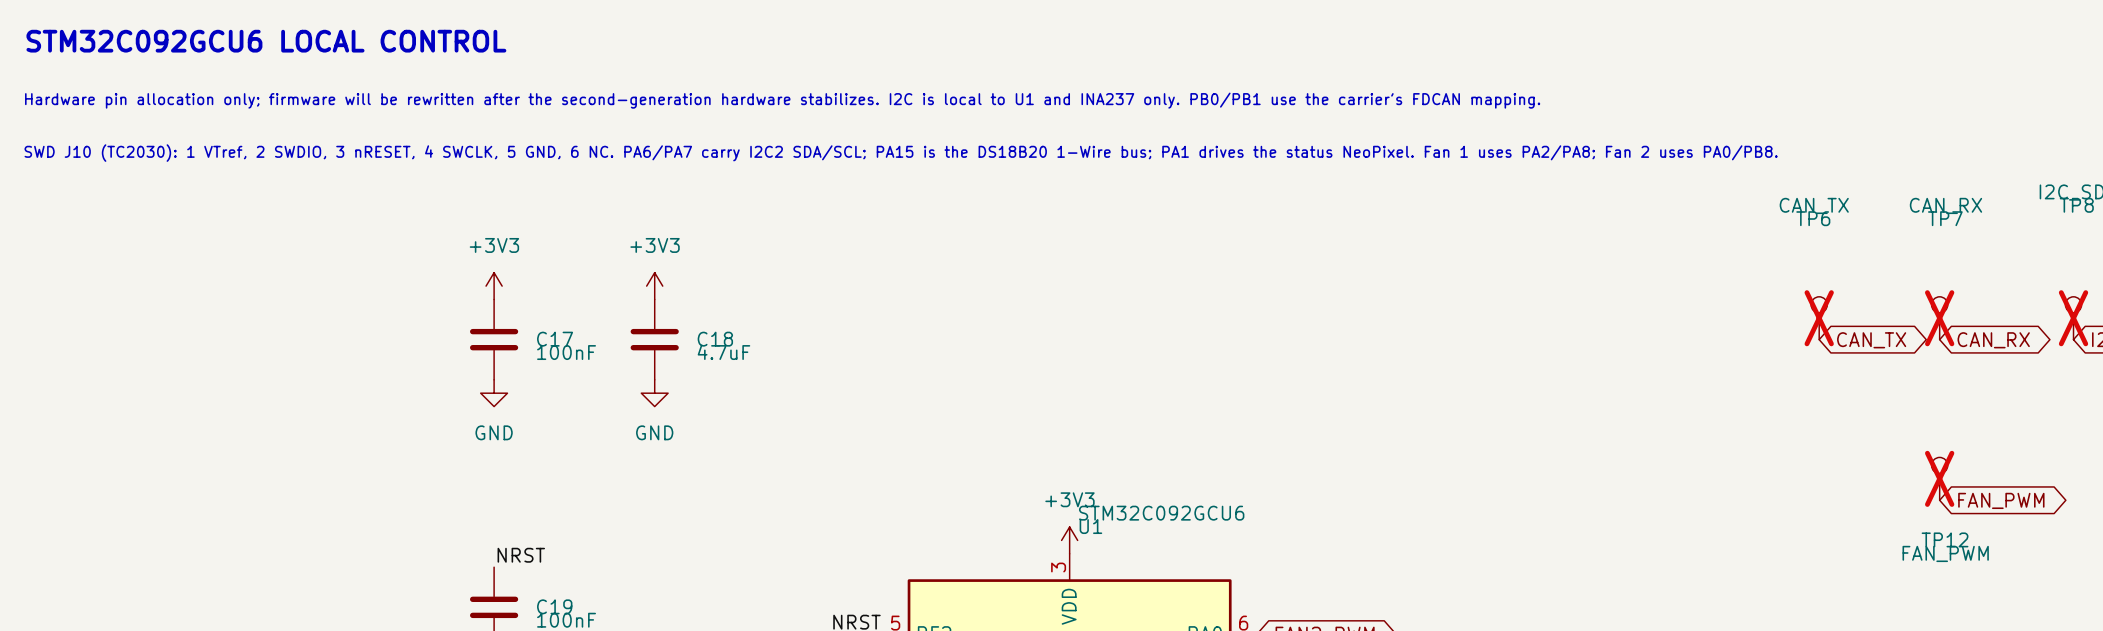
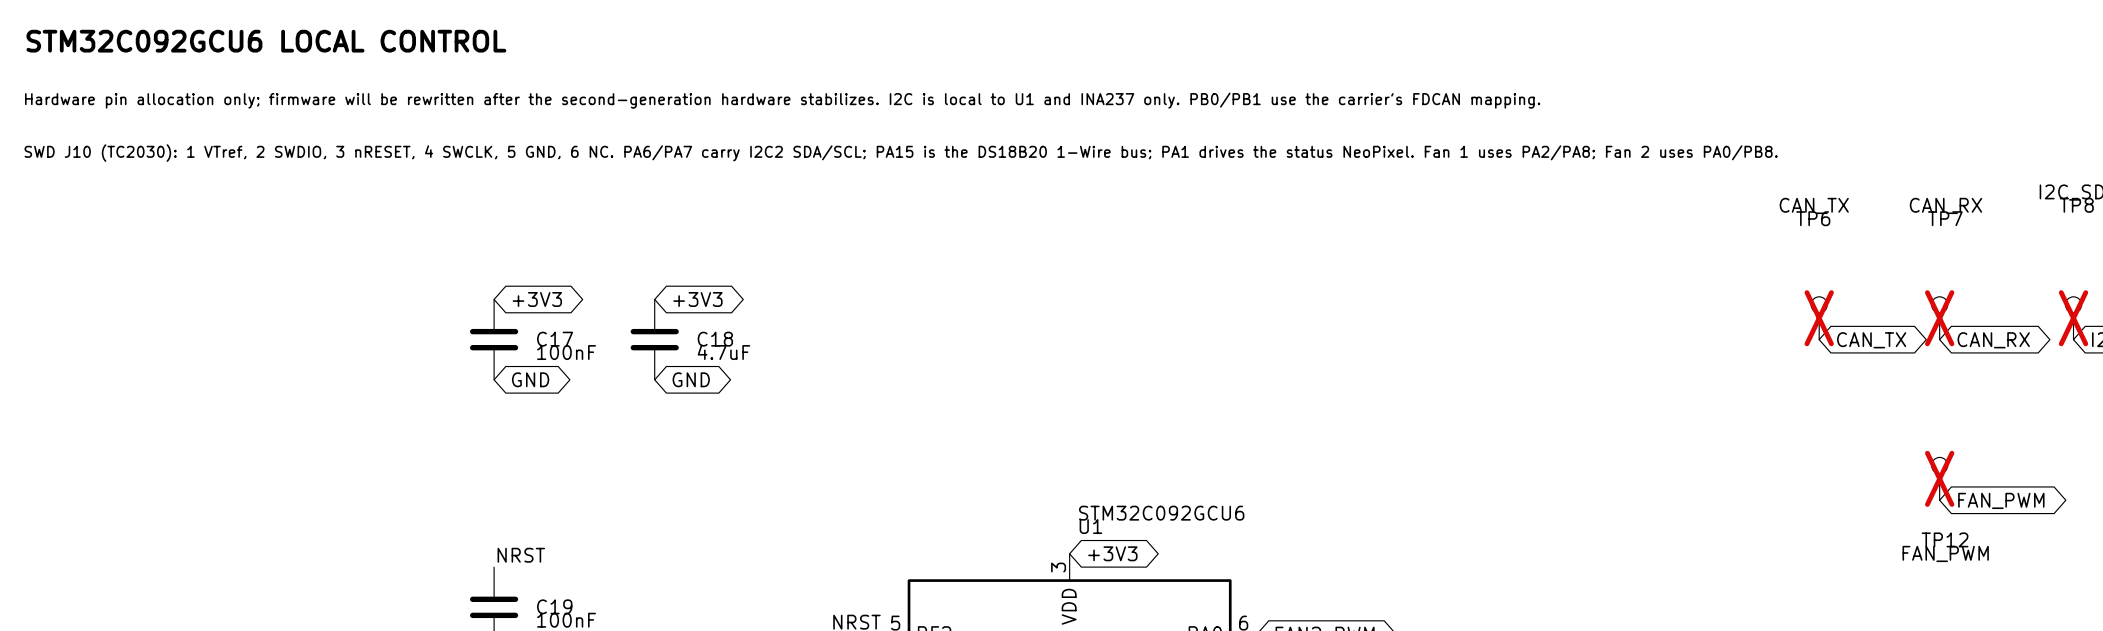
power symbol: +3V3 (494, 286) -> none
power symbol: +3V3 (654, 286) -> none
global label: none -> +3V3 (537, 299)
global label: none -> +3V3 (697, 299)
global label: none -> GND (530, 379)
global label: none -> GND (691, 379)
power symbol: GND (494, 393) -> none
power symbol: GND (654, 393) -> none
power symbol: +3V3 (1069, 540) -> none
global label: none -> +3V3 (1112, 553)

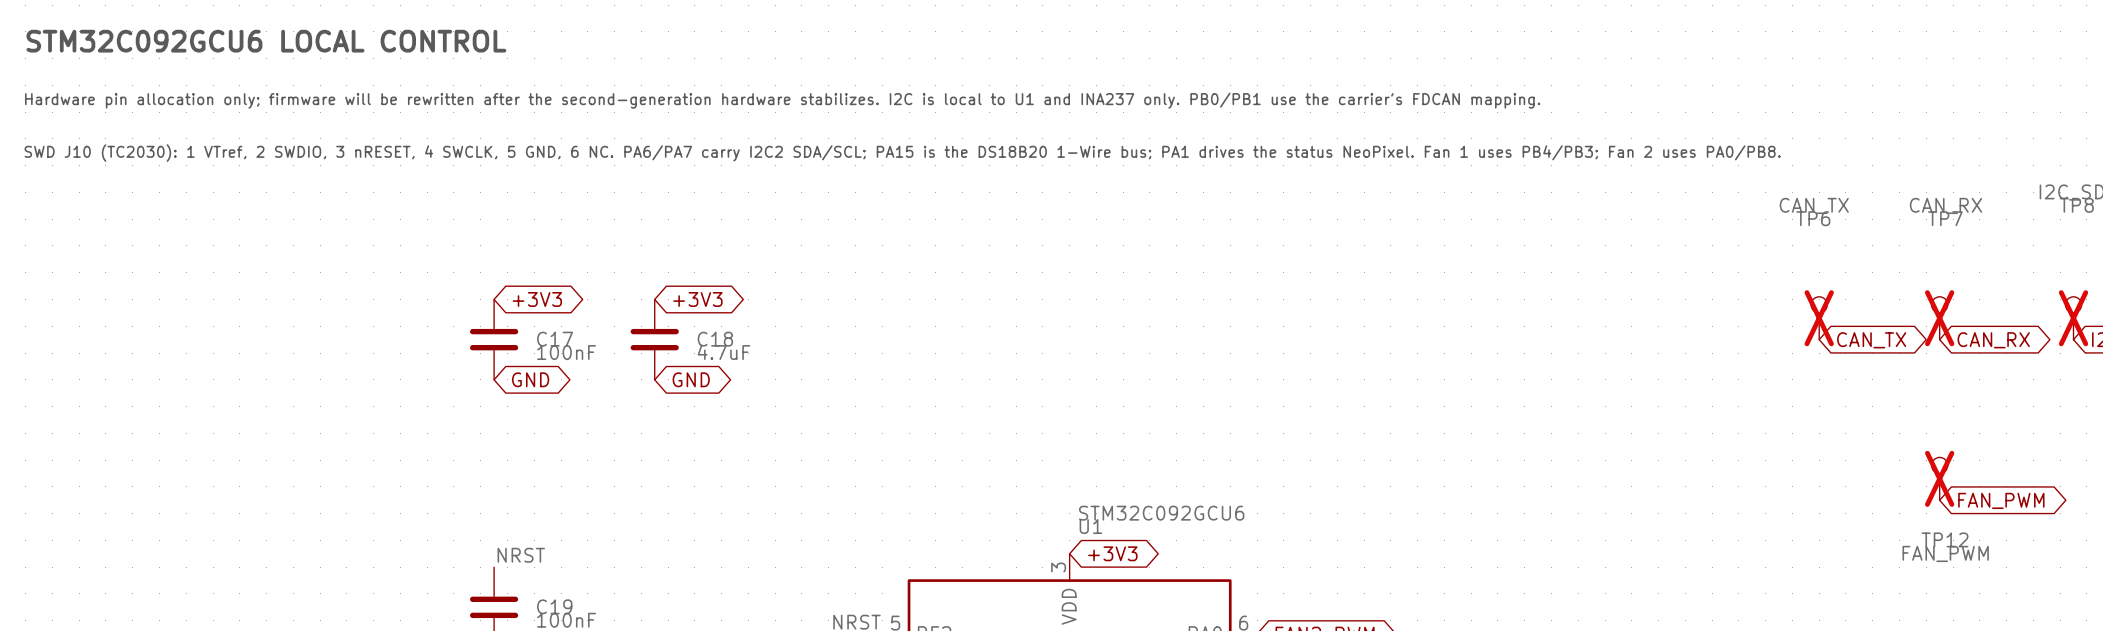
text: SWD J10 (TC2030): 1 VTref, 2 SWDIO, 3 nRESET, 4 SWCLK, 5 GND, 6 NC. PA6/PA7 carry I2C2 SDA/SCL; PA15 is the DS18B20 1-Wire bus; PA1 drives the status NeoPixel. Fan 1 uses PA2/PA8; Fan 2 uses PA0/PB8. (901, 153) -> SWD J10 (TC2030): 1 VTref, 2 SWDIO, 3 nRESET, 4 SWCLK, 5 GND, 6 NC. PA6/PA7 carry I2C2 SDA/SCL; PA15 is the DS18B20 1-Wire bus; PA1 drives the status NeoPixel. Fan 1 uses PB4/PB3; Fan 2 uses PA0/PB8. (902, 153)

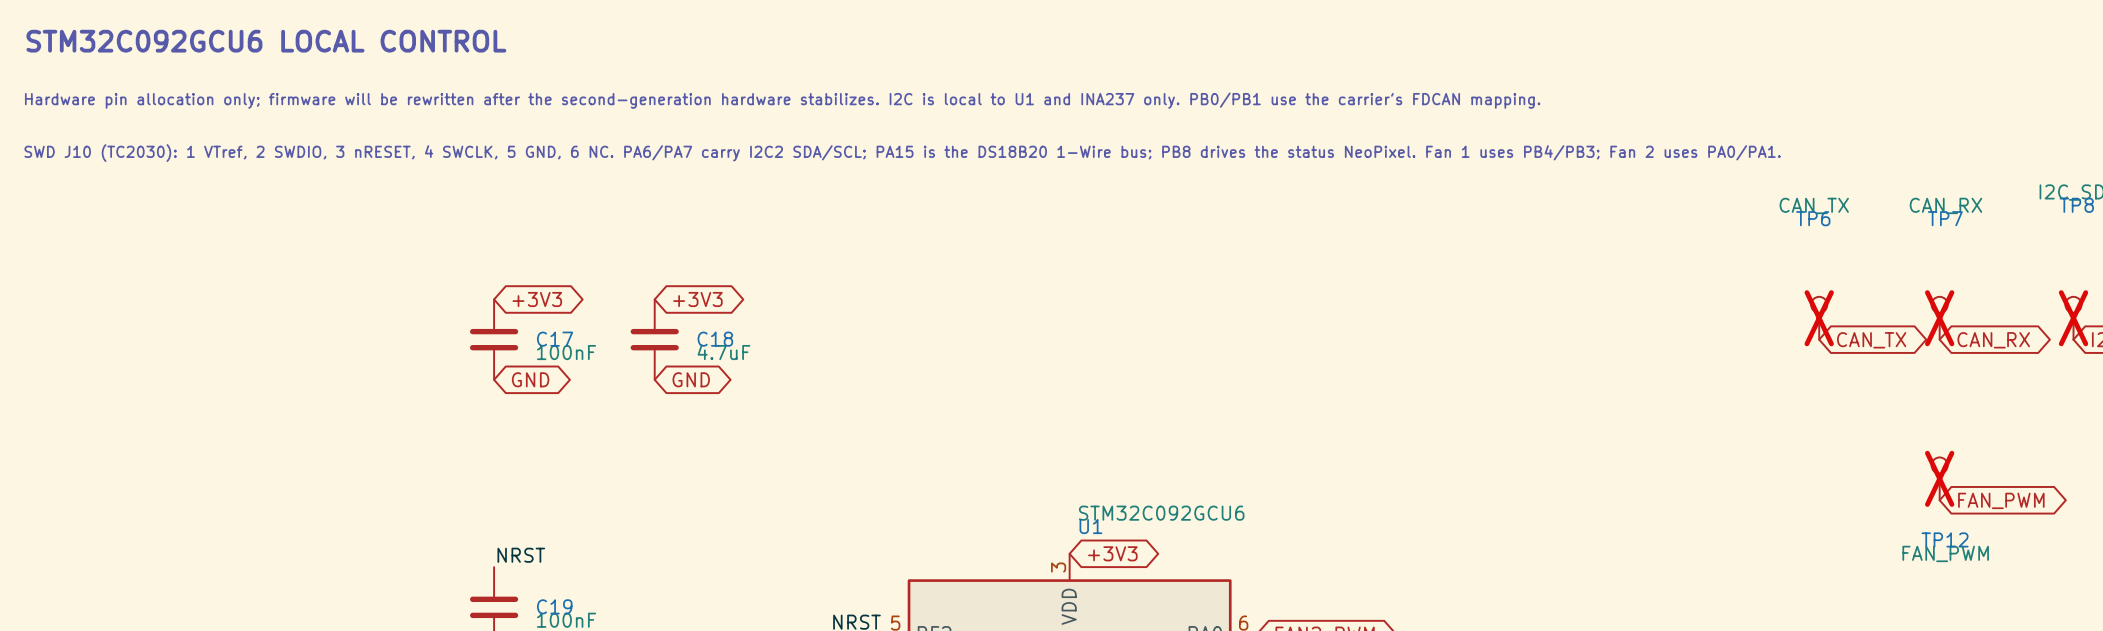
text: SWD J10 (TC2030): 1 VTref, 2 SWDIO, 3 nRESET, 4 SWCLK, 5 GND, 6 NC. PA6/PA7 carry I2C2 SDA/SCL; PA15 is the DS18B20 1-Wire bus; PA1 drives the status NeoPixel. Fan 1 uses PB4/PB3; Fan 2 uses PA0/PB8. (902, 153) -> SWD J10 (TC2030): 1 VTref, 2 SWDIO, 3 nRESET, 4 SWCLK, 5 GND, 6 NC. PA6/PA7 carry I2C2 SDA/SCL; PA15 is the DS18B20 1-Wire bus; PB8 drives the status NeoPixel. Fan 1 uses PB4/PB3; Fan 2 uses PA0/PA1. (902, 153)

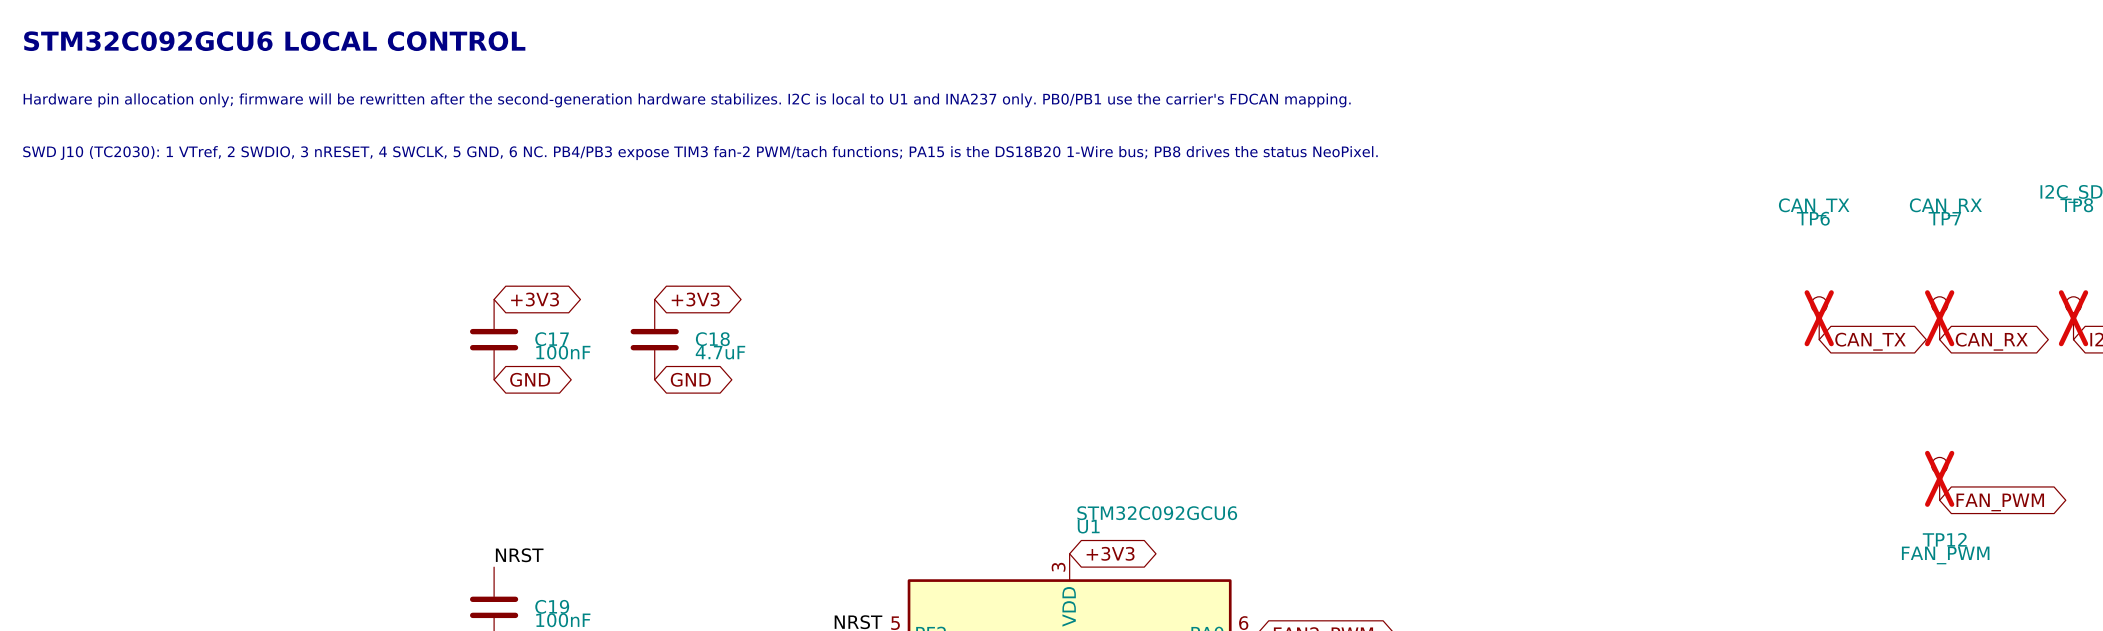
text: SWD J10 (TC2030): 1 VTref, 2 SWDIO, 3 nRESET, 4 SWCLK, 5 GND, 6 NC. PA6/PA7 carry I2C2 SDA/SCL; PA15 is the DS18B20 1-Wire bus; PB8 drives the status NeoPixel. Fan 1 uses PB4/PB3; Fan 2 uses PA0/PA1. (902, 153) -> SWD J10 (TC2030): 1 VTref, 2 SWDIO, 3 nRESET, 4 SWCLK, 5 GND, 6 NC. PB4/PB3 expose TIM3 fan-2 PWM/tach functions; PA15 is the DS18B20 1-Wire bus; PB8 drives the status NeoPixel. (700, 153)

